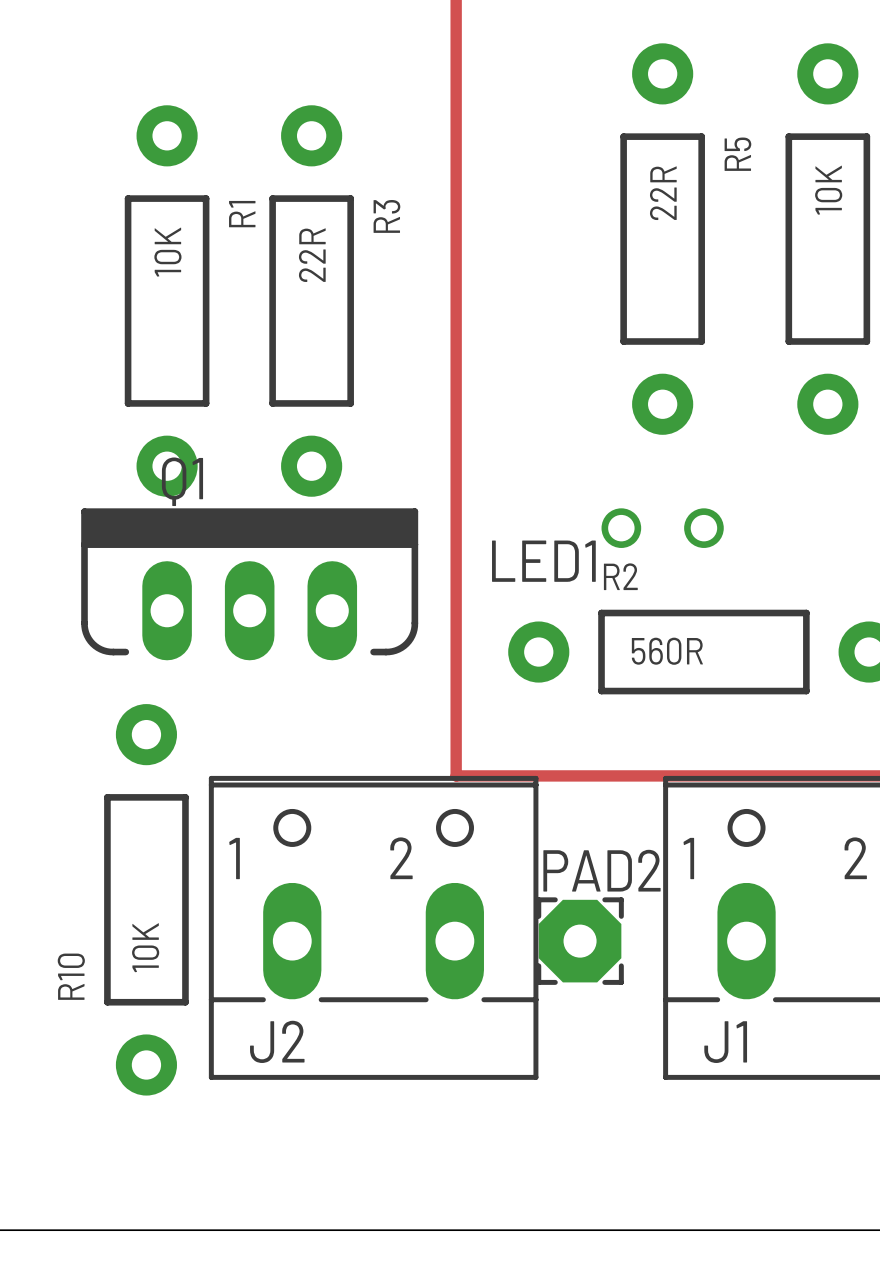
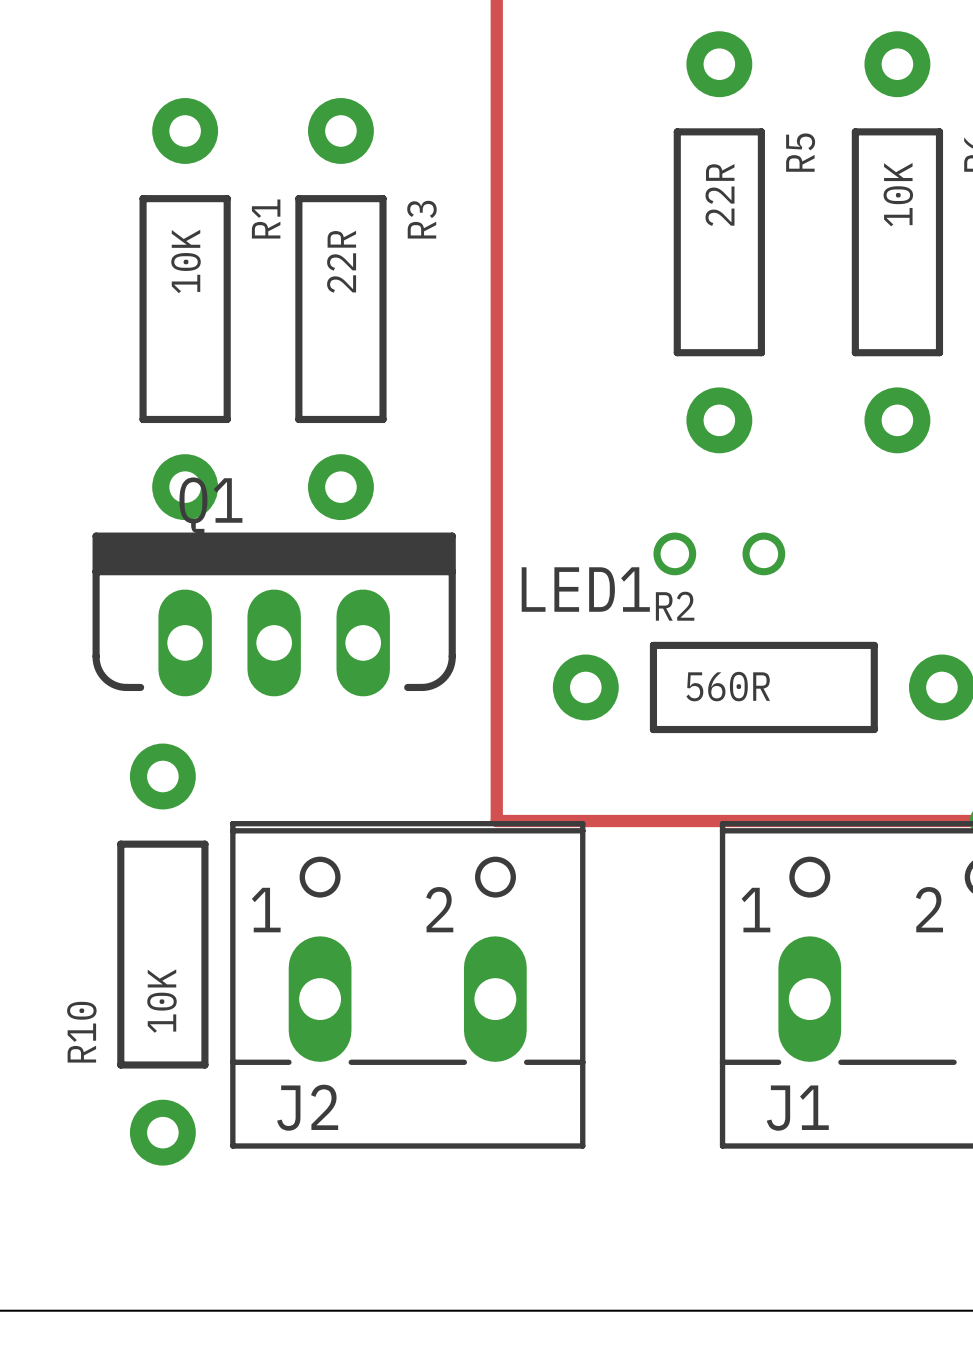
PAD2: (580, 941) -> none

